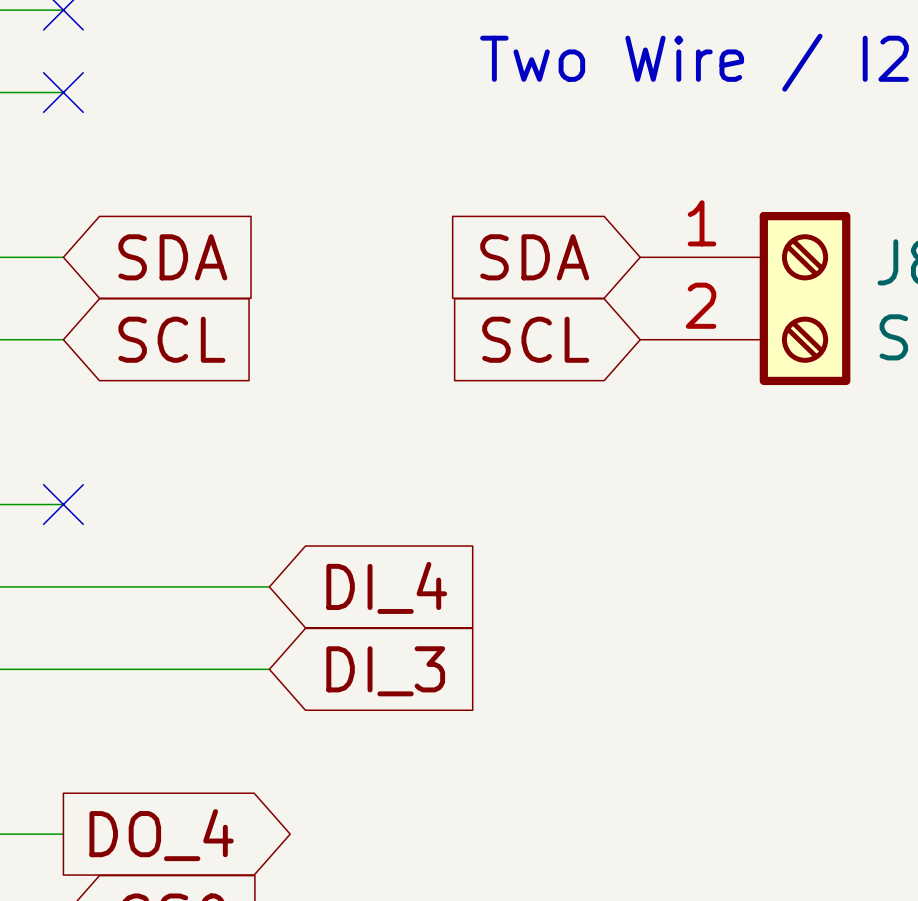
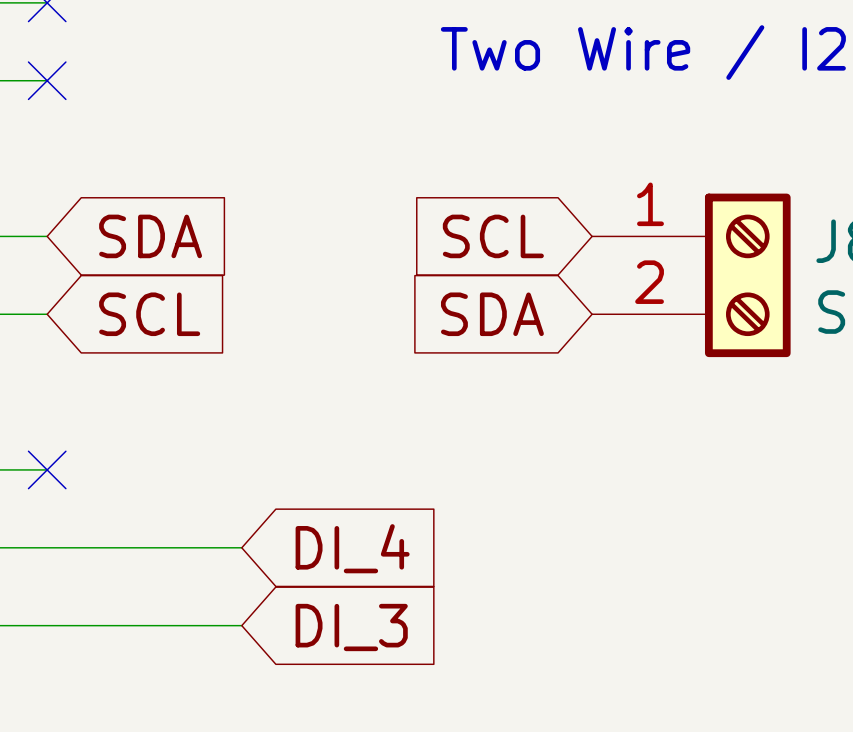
global label: SDA (534, 257) -> SCL (493, 236)
global label: SCL (535, 339) -> SDA (492, 314)

